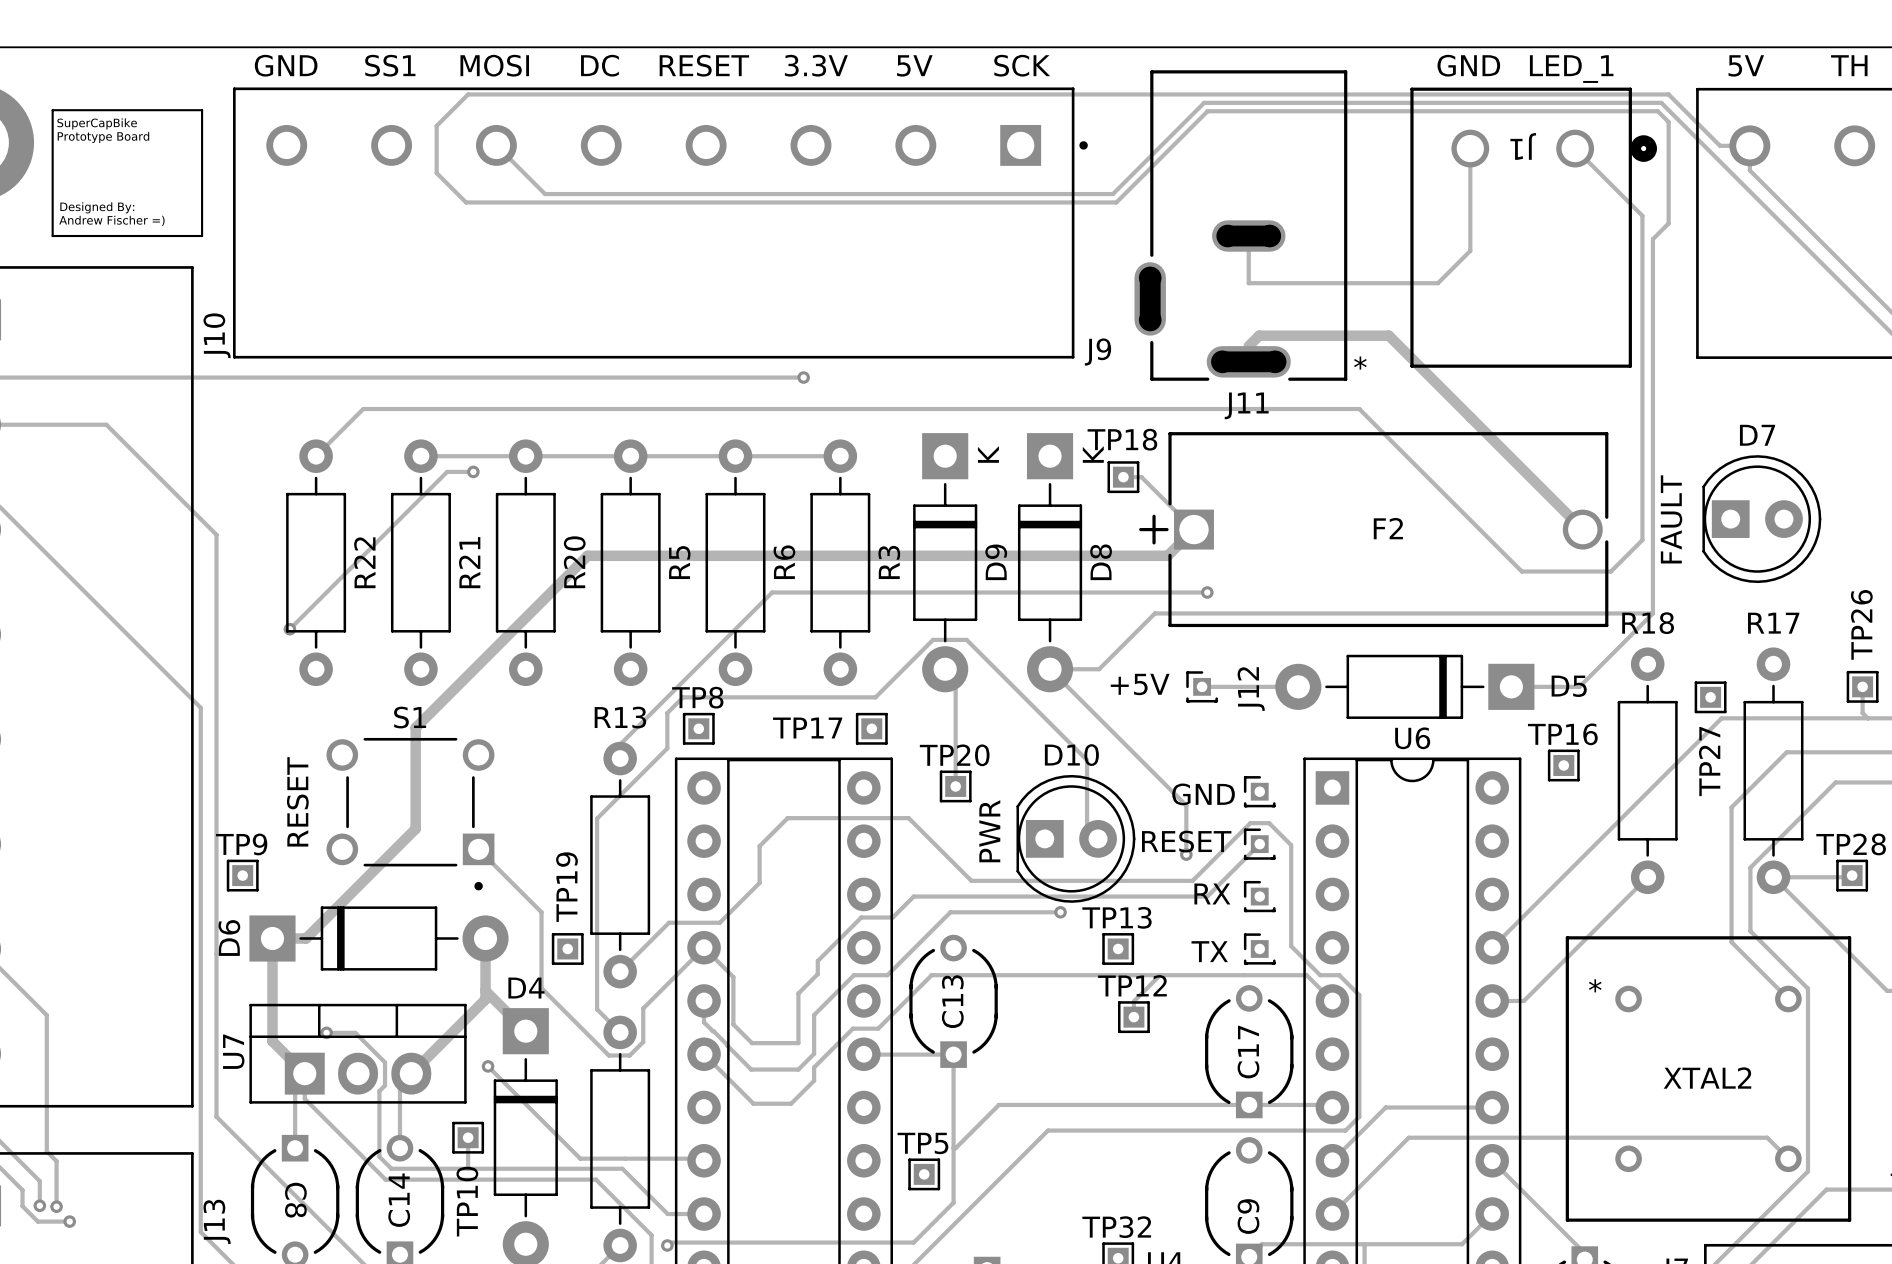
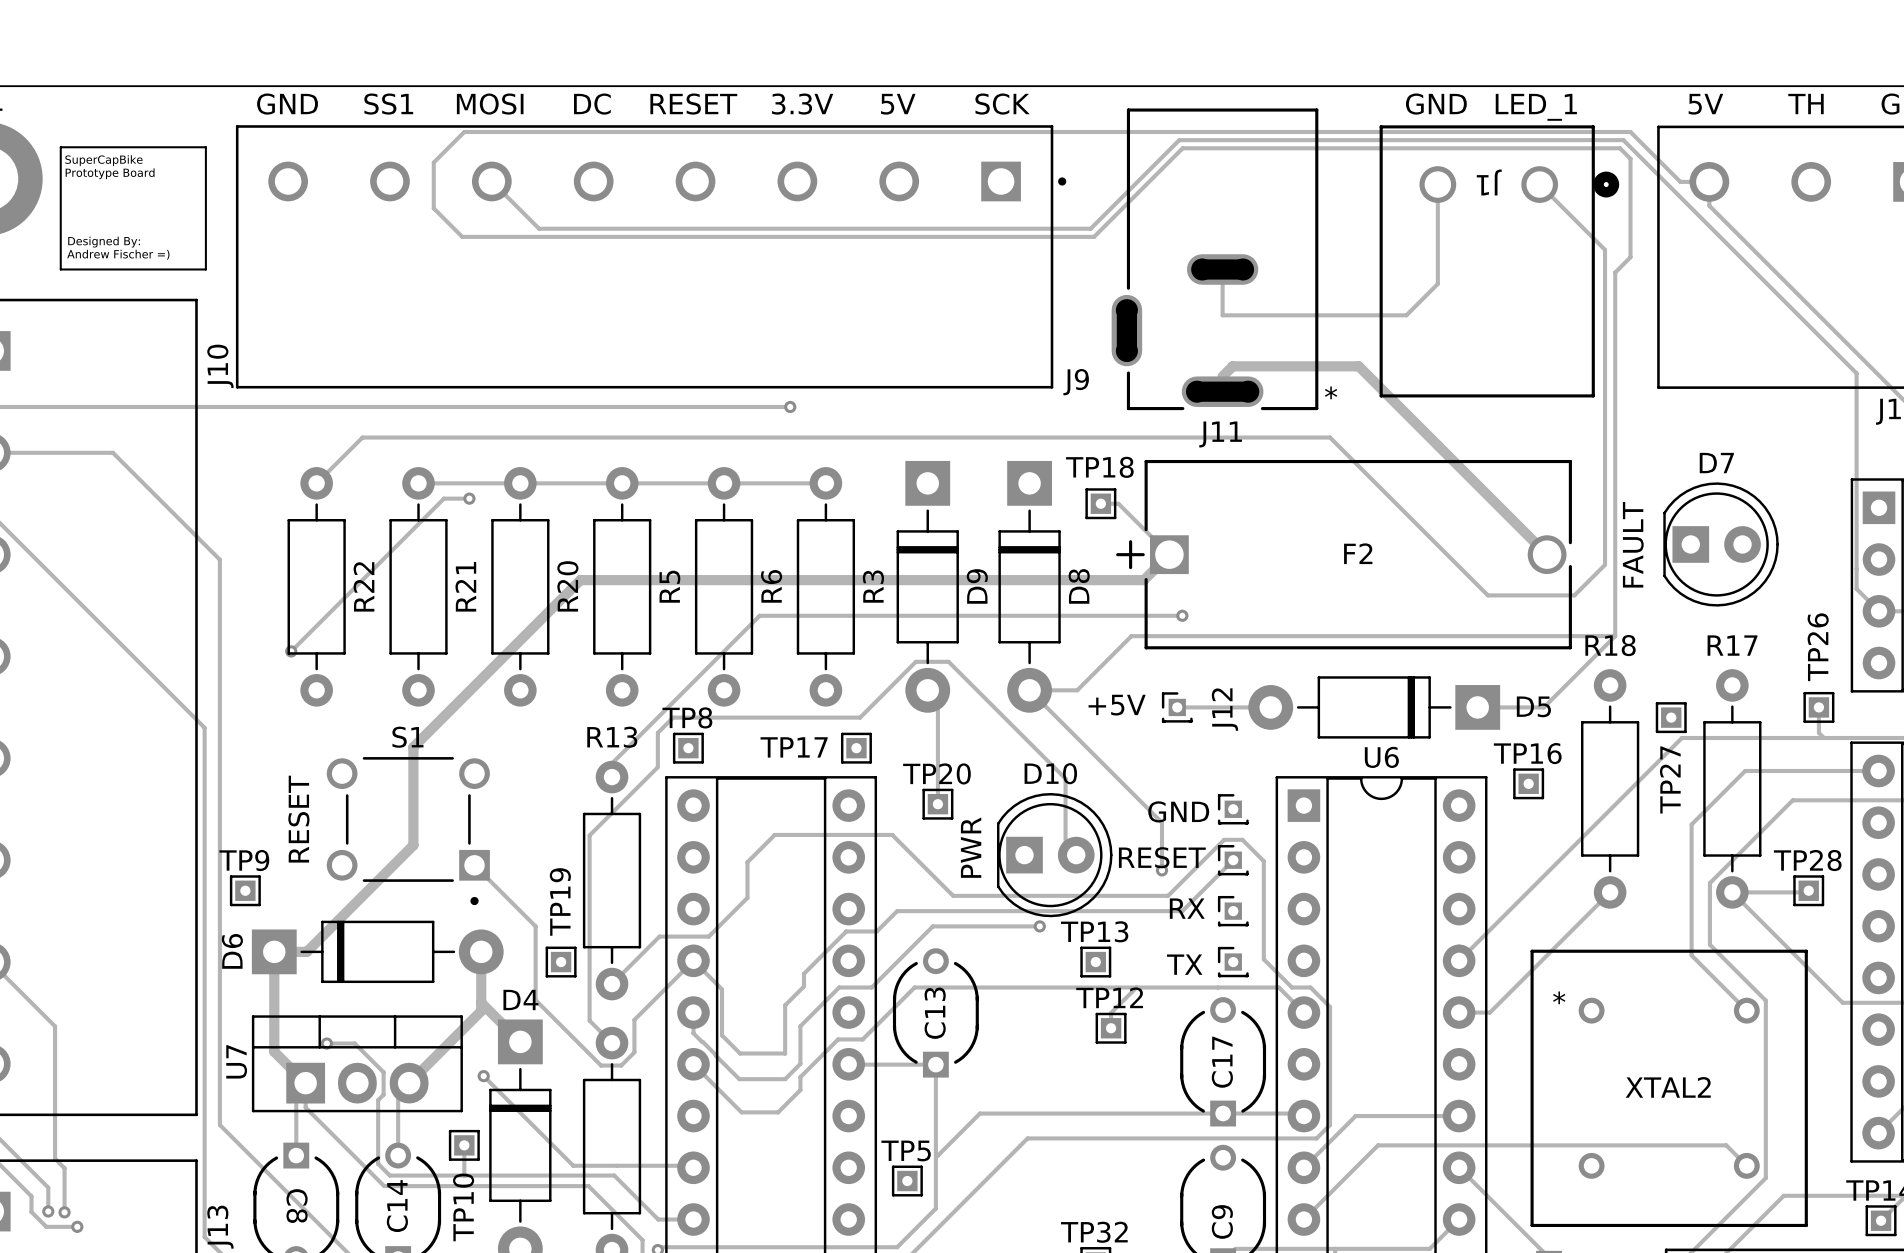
D9 text: K (988, 454) -> none
D8 text: K (1093, 454) -> none

